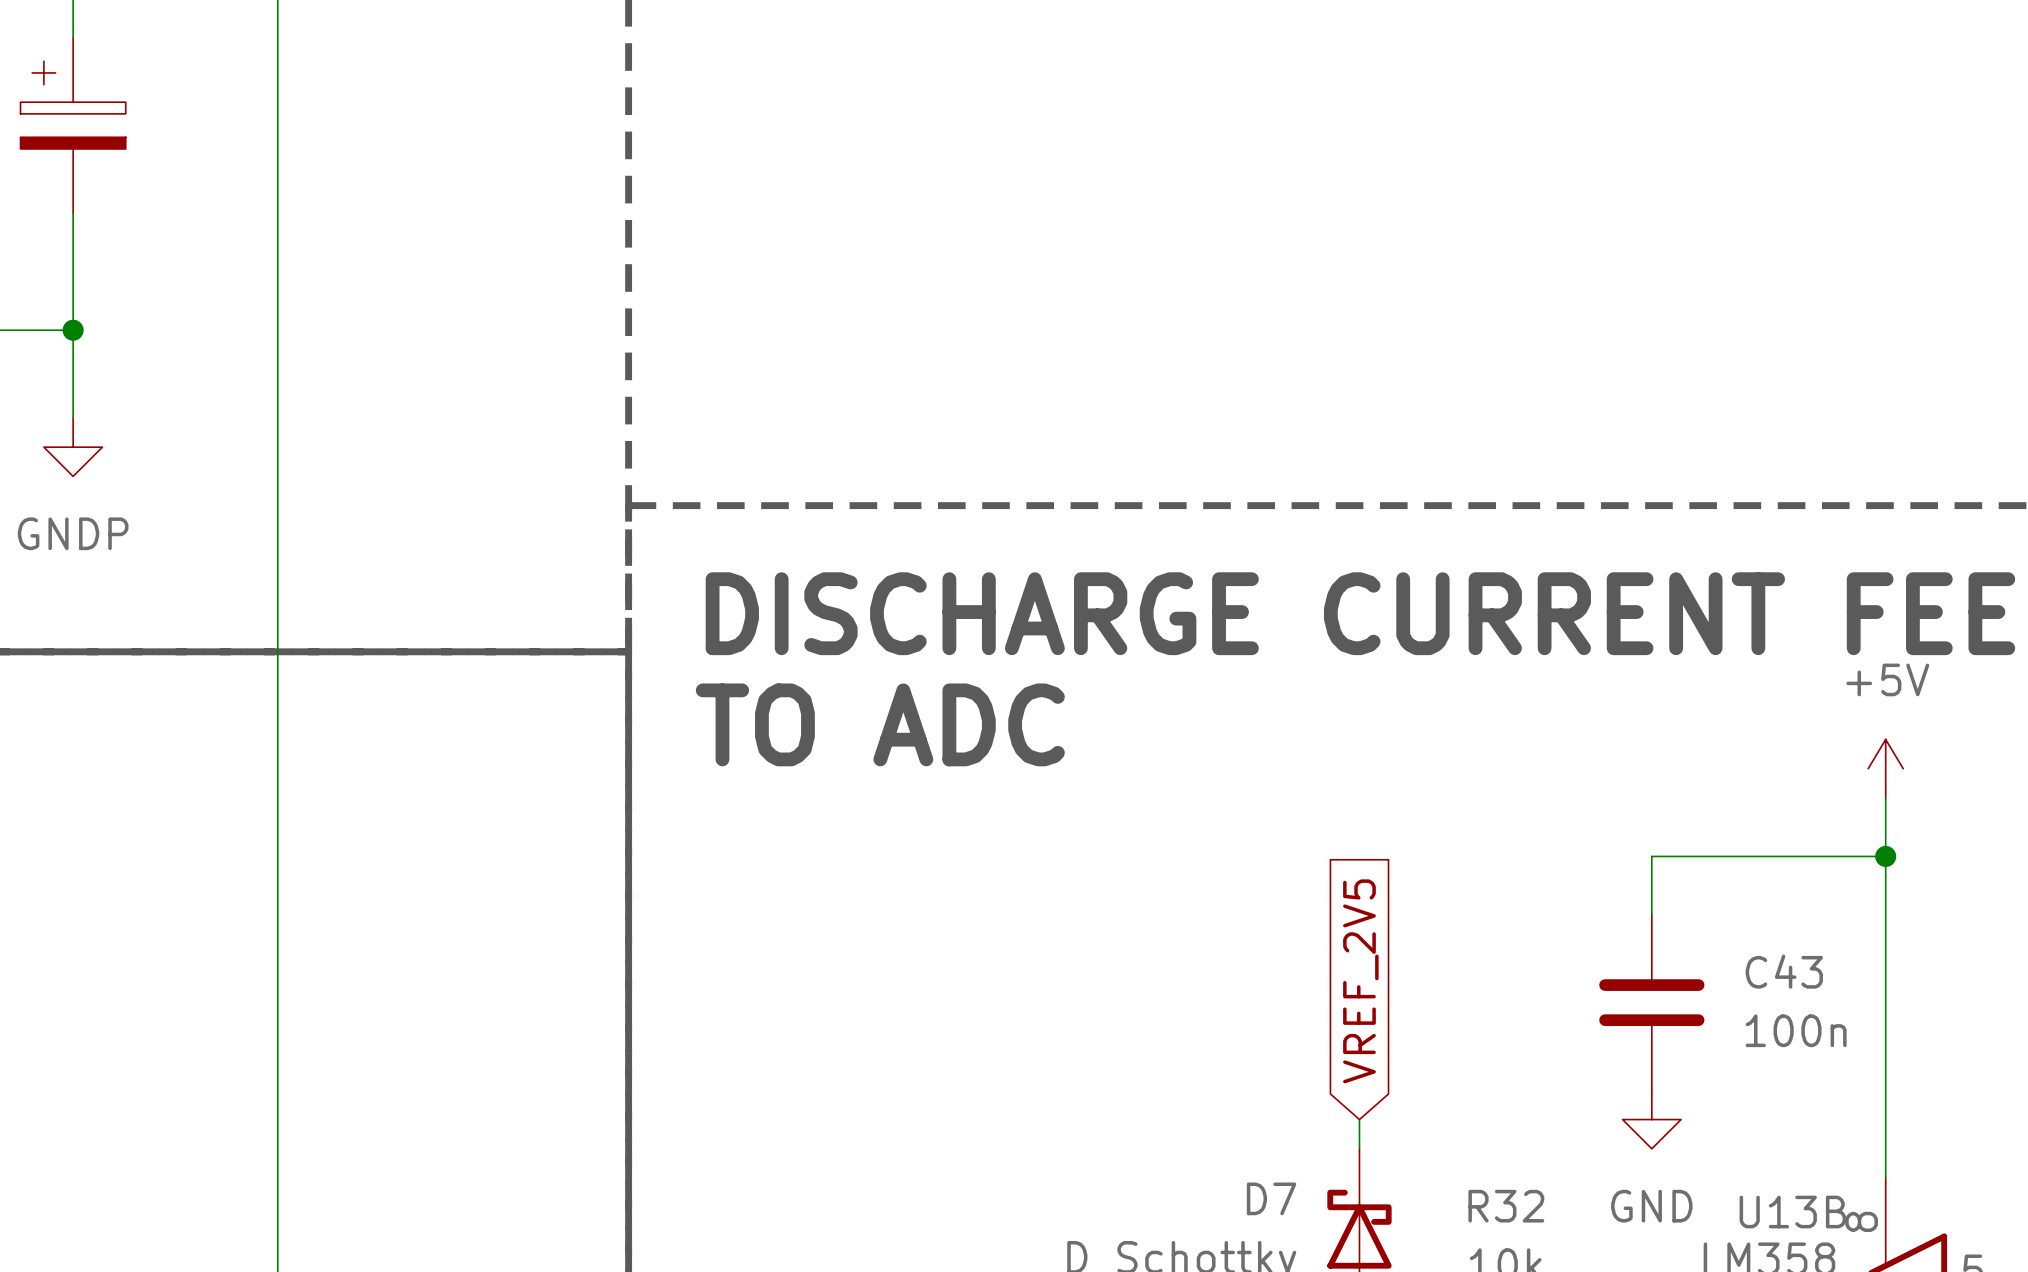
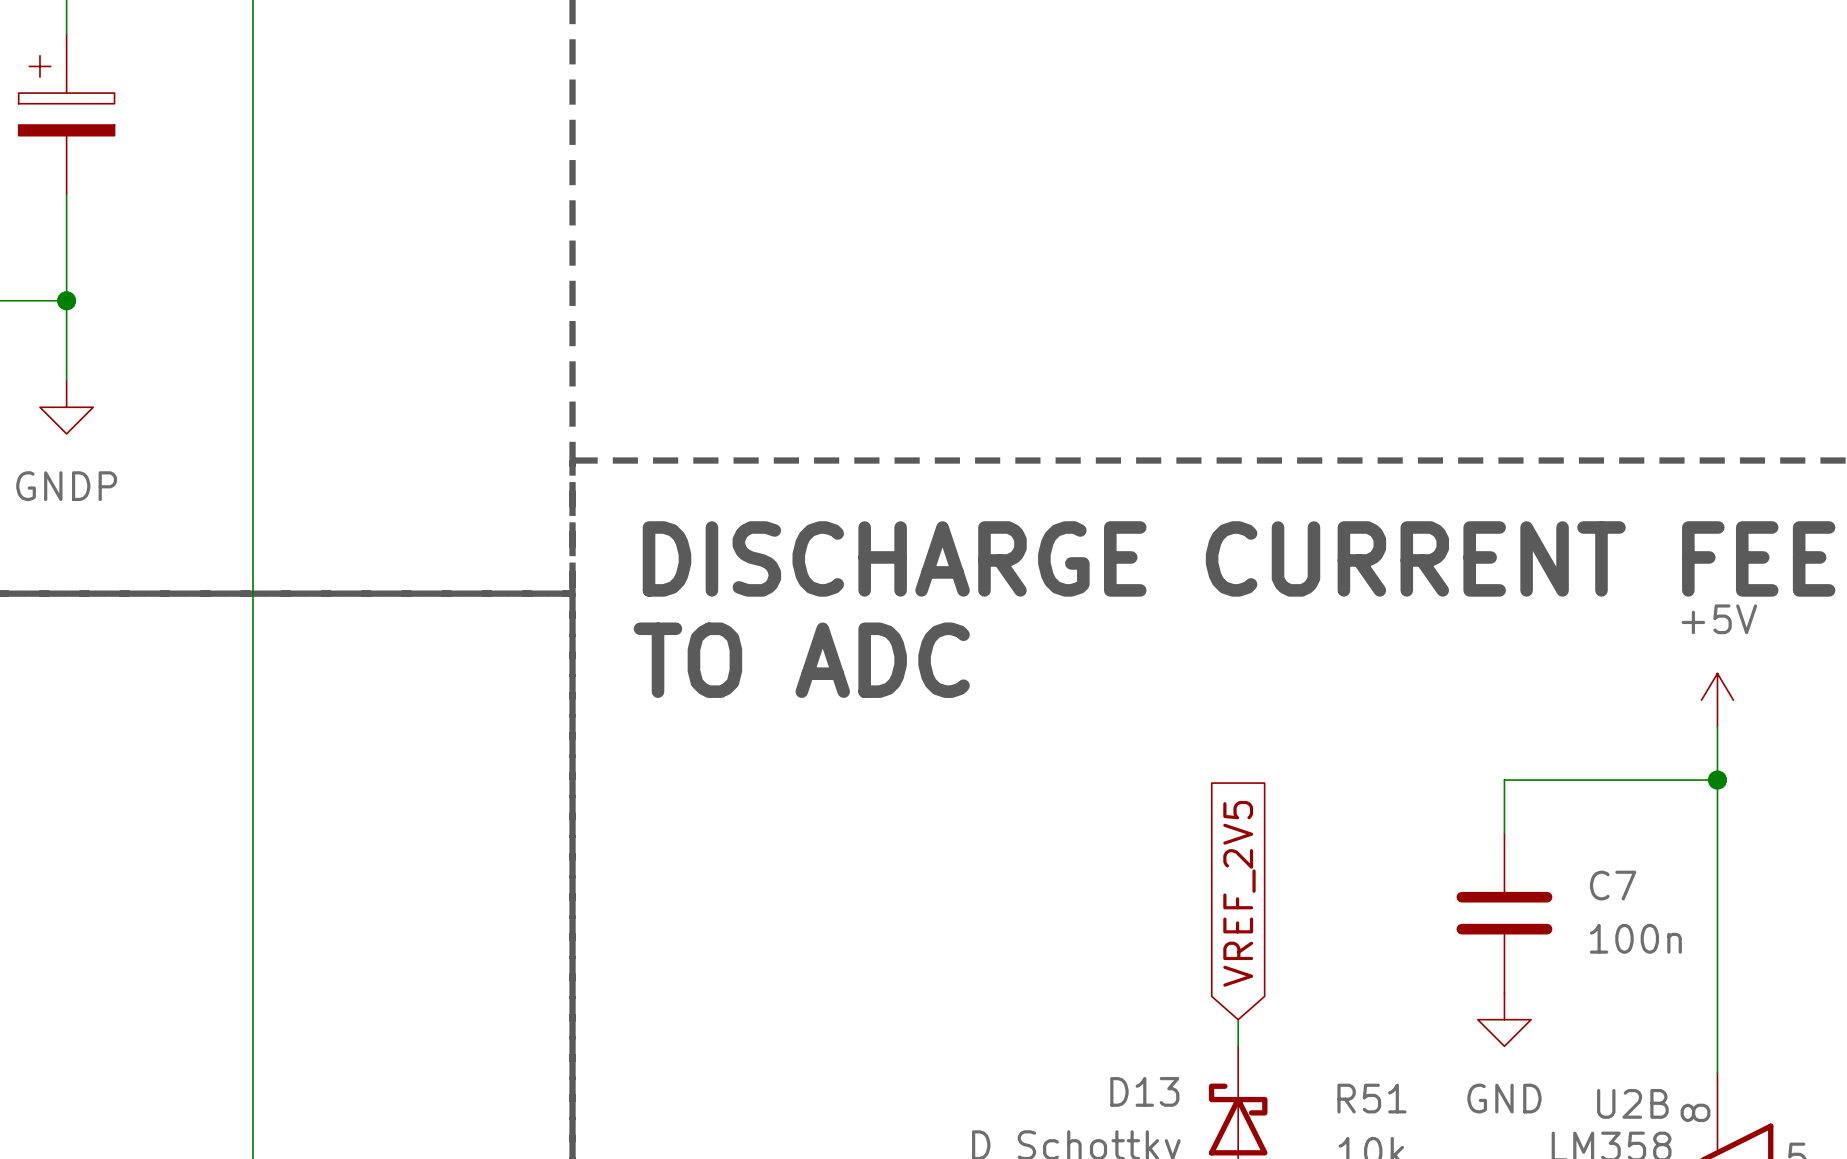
C43 name: C43 (1784, 971) -> C7 (1613, 885)
D7 name: D7 (1271, 1198) -> D13 (1144, 1091)
R32 name: R32 (1506, 1206) -> R51 (1371, 1098)
U13B name: U13B (1792, 1212) -> U2B (1632, 1103)

